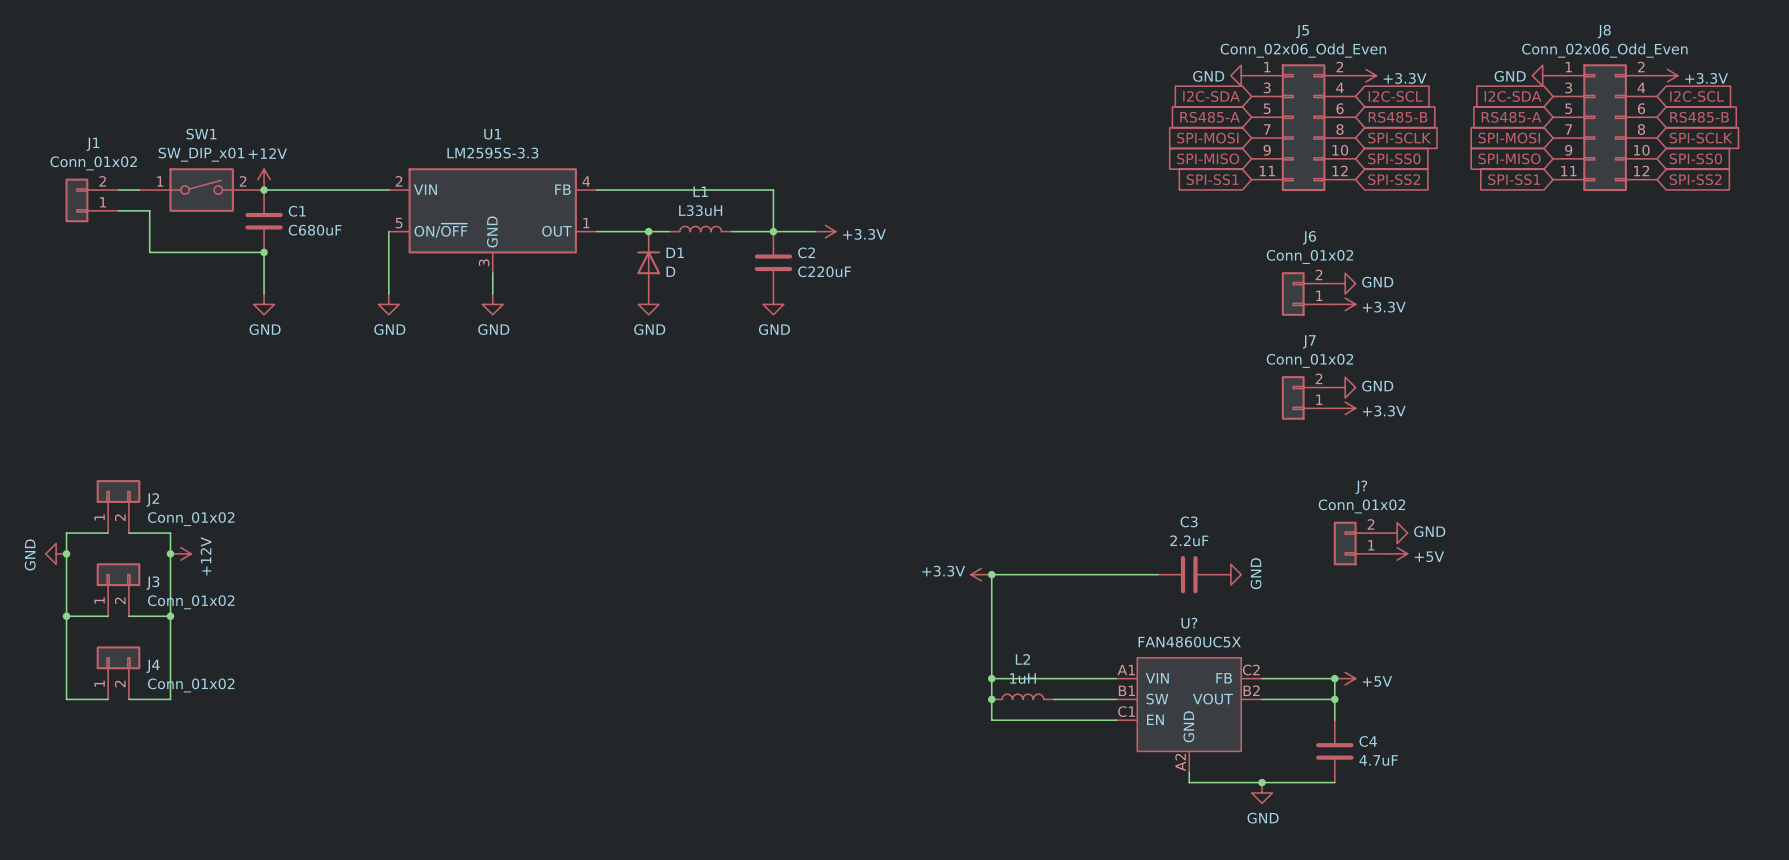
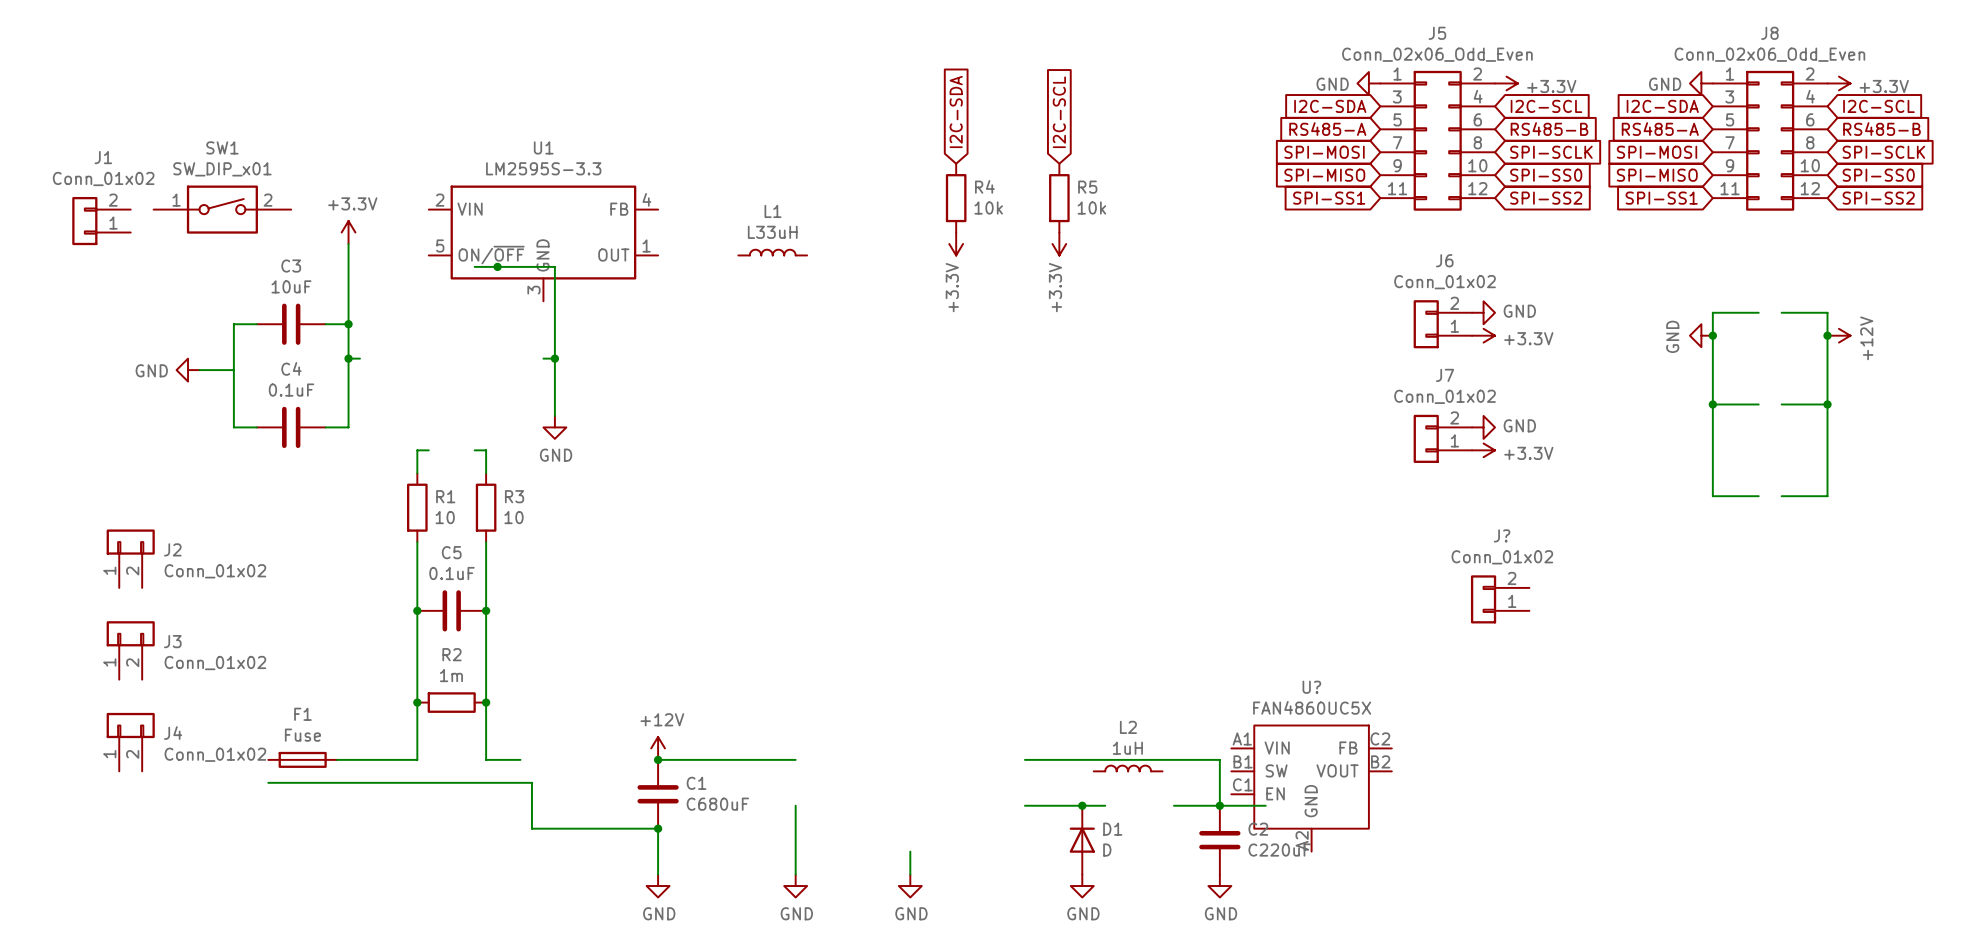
global label: none -> I2C-SDA (956, 111)
global label: none -> I2C-SCL (1059, 112)
power symbol: +12V (264, 179) -> none
R4: none -> 10k (956, 198)
R5: none -> 10k (1059, 198)
wire: (118, 190) (139, 190) -> none
wire: (264, 190) (388, 190) -> none
junction: (264, 190) -> none
wire: (596, 190) (773, 190) (773, 231) -> none
wire: (118, 210) (149, 210) (149, 252) (264, 252) (264, 293) -> none
power symbol: none -> +3.3V (348, 232)
C1 position: (264, 221) -> (658, 794)
wire: none -> (348, 243) (348, 427) (325, 427)
power symbol: none -> +3.3V (1059, 243)
wire: (388, 231) (388, 293) -> none
wire: (596, 231) (669, 231) -> none
junction: (648, 231) -> none
wire: (731, 231) (815, 231) -> none
junction: (773, 231) -> none
power symbol rotation: 0° (825, 231) -> 90° clockwise (956, 243)
power symbol position: +3.3V (825, 231) -> +3.3V (956, 243)
wire: none -> (474, 266) (554, 266) (554, 415)
junction: none -> (497, 266)
junction: (264, 252) -> none
D1 position: (648, 262) -> (1082, 840)
C2 position: (773, 262) -> (1219, 840)
wire: (492, 273) (492, 293) -> none
wire: none -> (1758, 312) (1712, 312) (1712, 496) (1758, 496)
wire: none -> (1781, 312) (1827, 312) (1827, 496) (1781, 496)
wire: none -> (256, 324) (233, 324) (233, 427) (256, 427)
wire: none -> (325, 324) (348, 324)
junction: none -> (348, 324)
power symbol rotation: 0° (264, 304) -> 90° clockwise (188, 370)
power symbol position: GND (264, 304) -> GND (188, 370)
power symbol: GND (388, 304) -> none
power symbol: GND (492, 304) -> none
power symbol: GND (648, 304) -> none
power symbol: GND (773, 304) -> none
power symbol: none -> GND (1701, 335)
junction: none -> (1712, 335)
junction: none -> (1827, 335)
power symbol: none -> +12V (1838, 335)
wire: none -> (348, 358) (360, 358)
junction: none -> (348, 358)
wire: none -> (543, 358) (554, 358)
junction: none -> (554, 358)
wire: none -> (199, 370) (233, 370)
wire: none -> (1712, 404) (1758, 404)
junction: none -> (1712, 404)
wire: none -> (1781, 404) (1827, 404)
junction: none -> (1827, 404)
power symbol: none -> GND (554, 427)
wire: none -> (428, 450) (417, 450) (417, 473)
wire: none -> (474, 450) (486, 450) (486, 473)
R1: none -> 10 (417, 507)
R3: none -> 10 (486, 507)
wire: none -> (417, 542) (417, 759) (337, 759)
wire: none -> (486, 542) (486, 759) (520, 759)
wire: (108, 533) (66, 533) (66, 699) (108, 699) -> none
wire: (128, 533) (170, 533) (170, 699) (128, 699) -> none
power symbol: GND (1397, 533) -> none
C3 value: 2.2uF (1189, 540) -> 10uF (291, 286)
power symbol: GND (56, 553) -> none
junction: (66, 553) -> none
junction: (170, 553) -> none
power symbol: +12V (180, 553) -> none
junction: none -> (417, 610)
C5: none -> 0.1uF (451, 610)
junction: none -> (486, 610)
power symbol: +5V (1397, 553) -> none
power symbol: +3.3V (981, 574) -> none
junction: (991, 574) -> none
wire: (1158, 574) (991, 574) (991, 720) (1116, 720) -> none
C3 position: (1189, 574) -> (291, 324)
power symbol: GND (1230, 574) -> none
wire: (66, 616) (108, 616) -> none
junction: (66, 616) -> none
wire: (128, 616) (170, 616) -> none
junction: (170, 616) -> none
junction: none -> (417, 702)
R2: none -> 1m (451, 702)
junction: none -> (486, 702)
power symbol: none -> +12V (658, 748)
wire: (991, 678) (1116, 678) -> none
junction: (991, 678) -> none
wire: (1262, 678) (1334, 678) (1334, 720) -> none
junction: (1334, 678) -> none
power symbol: +5V (1345, 678) -> none
F1: none -> Fuse (302, 759)
wire: none -> (658, 759) (795, 759)
junction: none -> (658, 759)
wire: none -> (1024, 759) (1219, 759) (1219, 805)
junction: (991, 699) -> none
wire: (1054, 699) (1116, 699) -> none
wire: (1262, 699) (1334, 699) -> none
junction: (1334, 699) -> none
wire: none -> (268, 782) (531, 782) (531, 828) (658, 828) (658, 874)
wire: none -> (795, 805) (795, 874)
wire: none -> (1024, 805) (1105, 805)
junction: none -> (1082, 805)
wire: none -> (1174, 805) (1265, 805)
junction: none -> (1219, 805)
C4 name position: C4 (1368, 741) -> C4 (291, 368)
junction: none -> (658, 828)
C4 rotation: 0° (1334, 751) -> 90° clockwise (291, 427)
C4 position: (1334, 751) -> (291, 427)
C4 value: 4.7uF (1378, 760) -> 0.1uF (291, 390)
wire: none -> (910, 851) (910, 874)
wire: (1189, 772) (1189, 782) (1334, 782) -> none
junction: (1262, 782) -> none
power symbol: GND (1262, 792) -> none
power symbol: none -> GND (658, 886)
power symbol: none -> GND (795, 886)
power symbol: none -> GND (910, 886)
power symbol: none -> GND (1082, 886)
power symbol: none -> GND (1219, 886)

